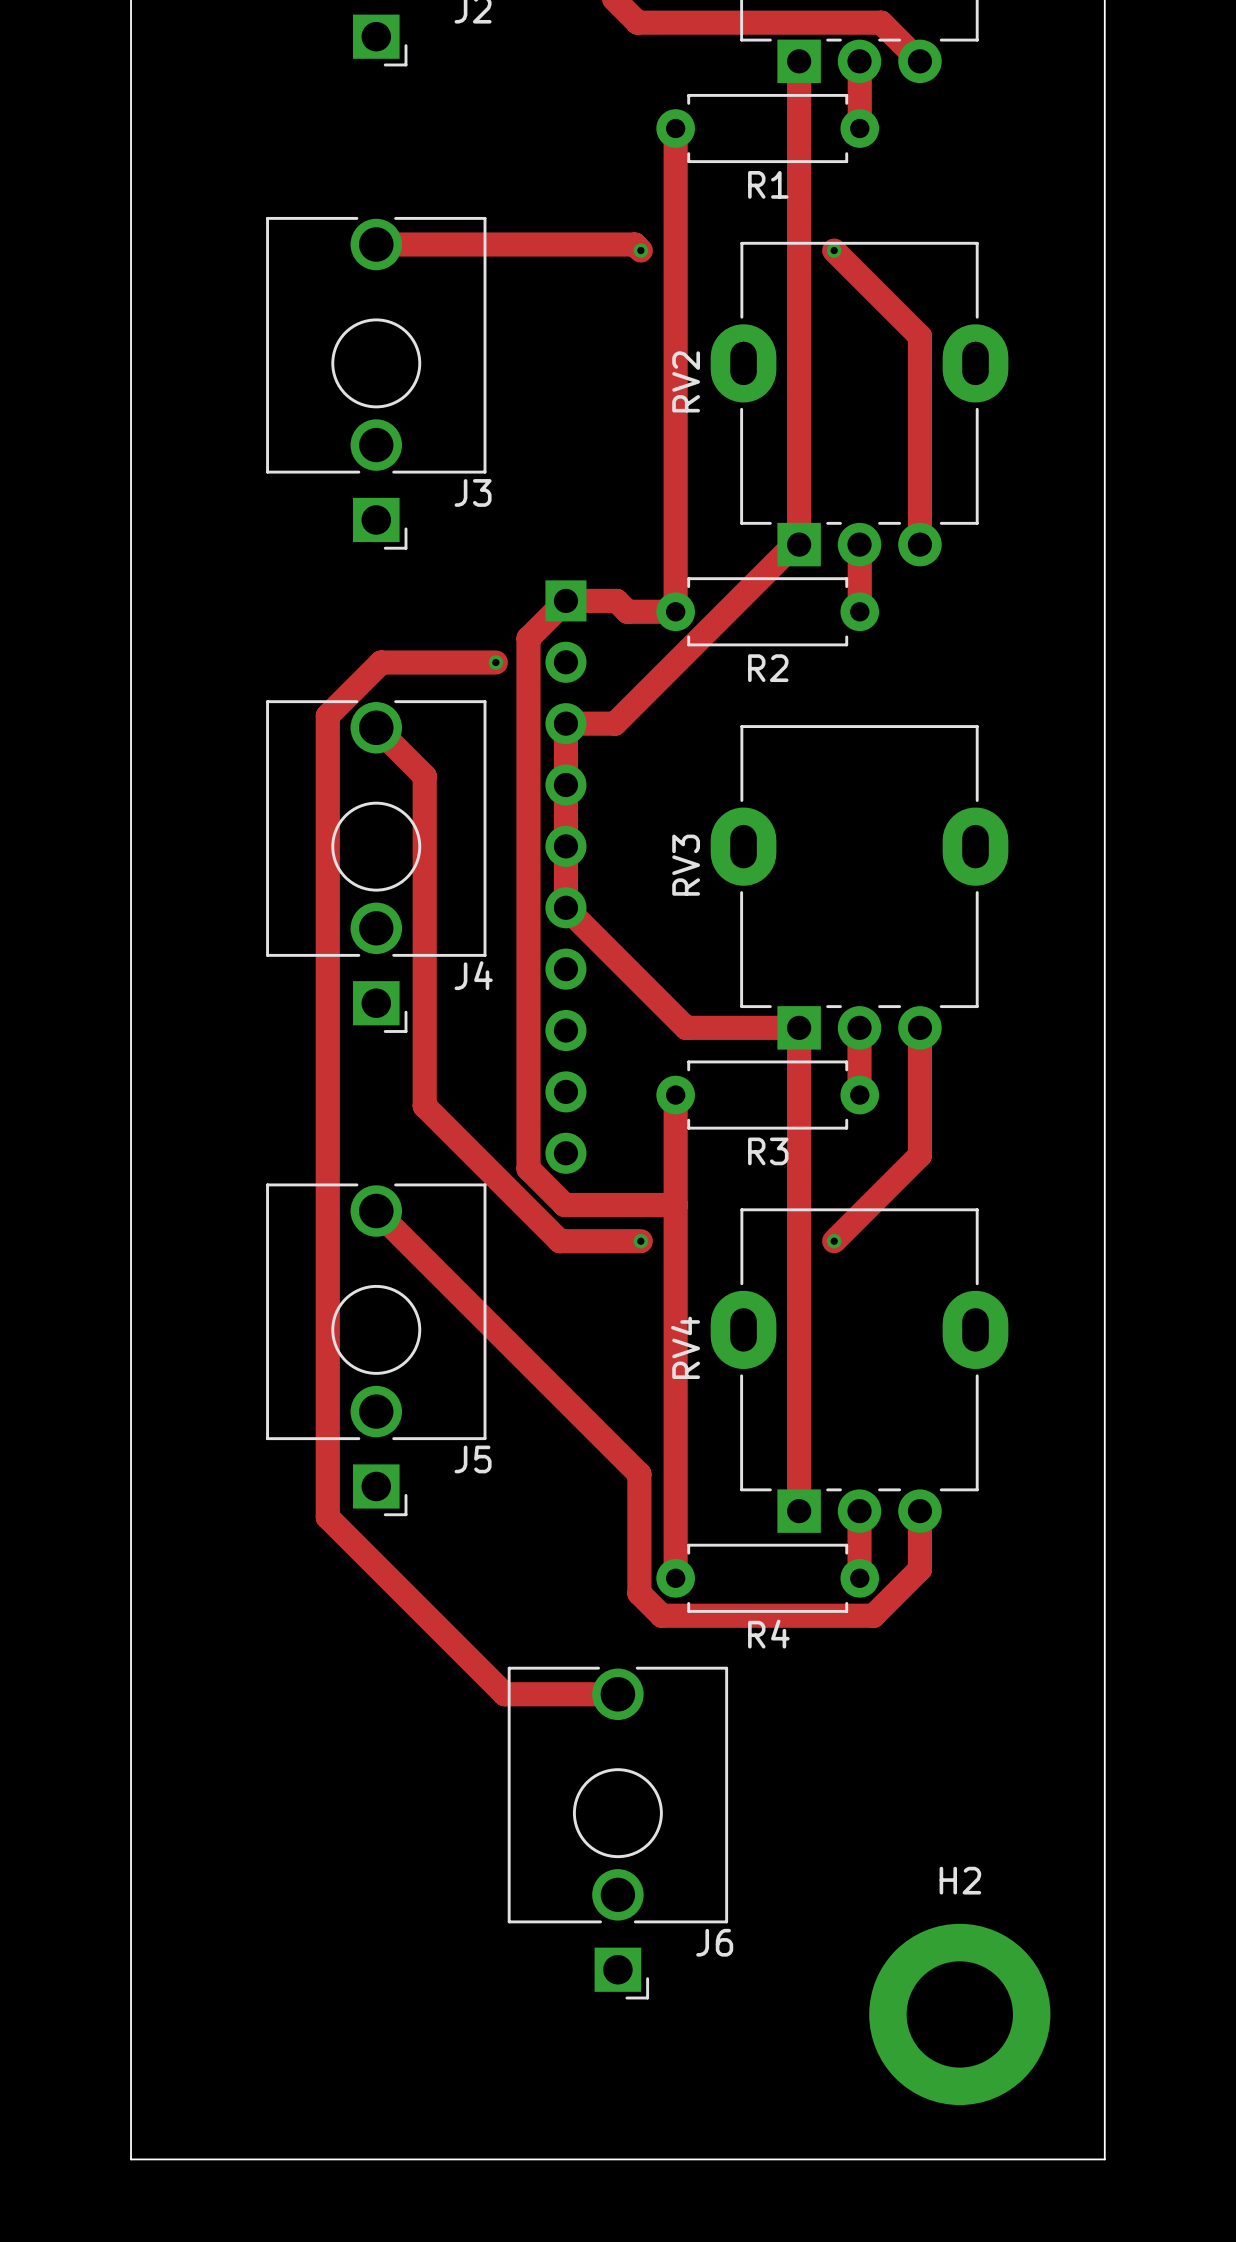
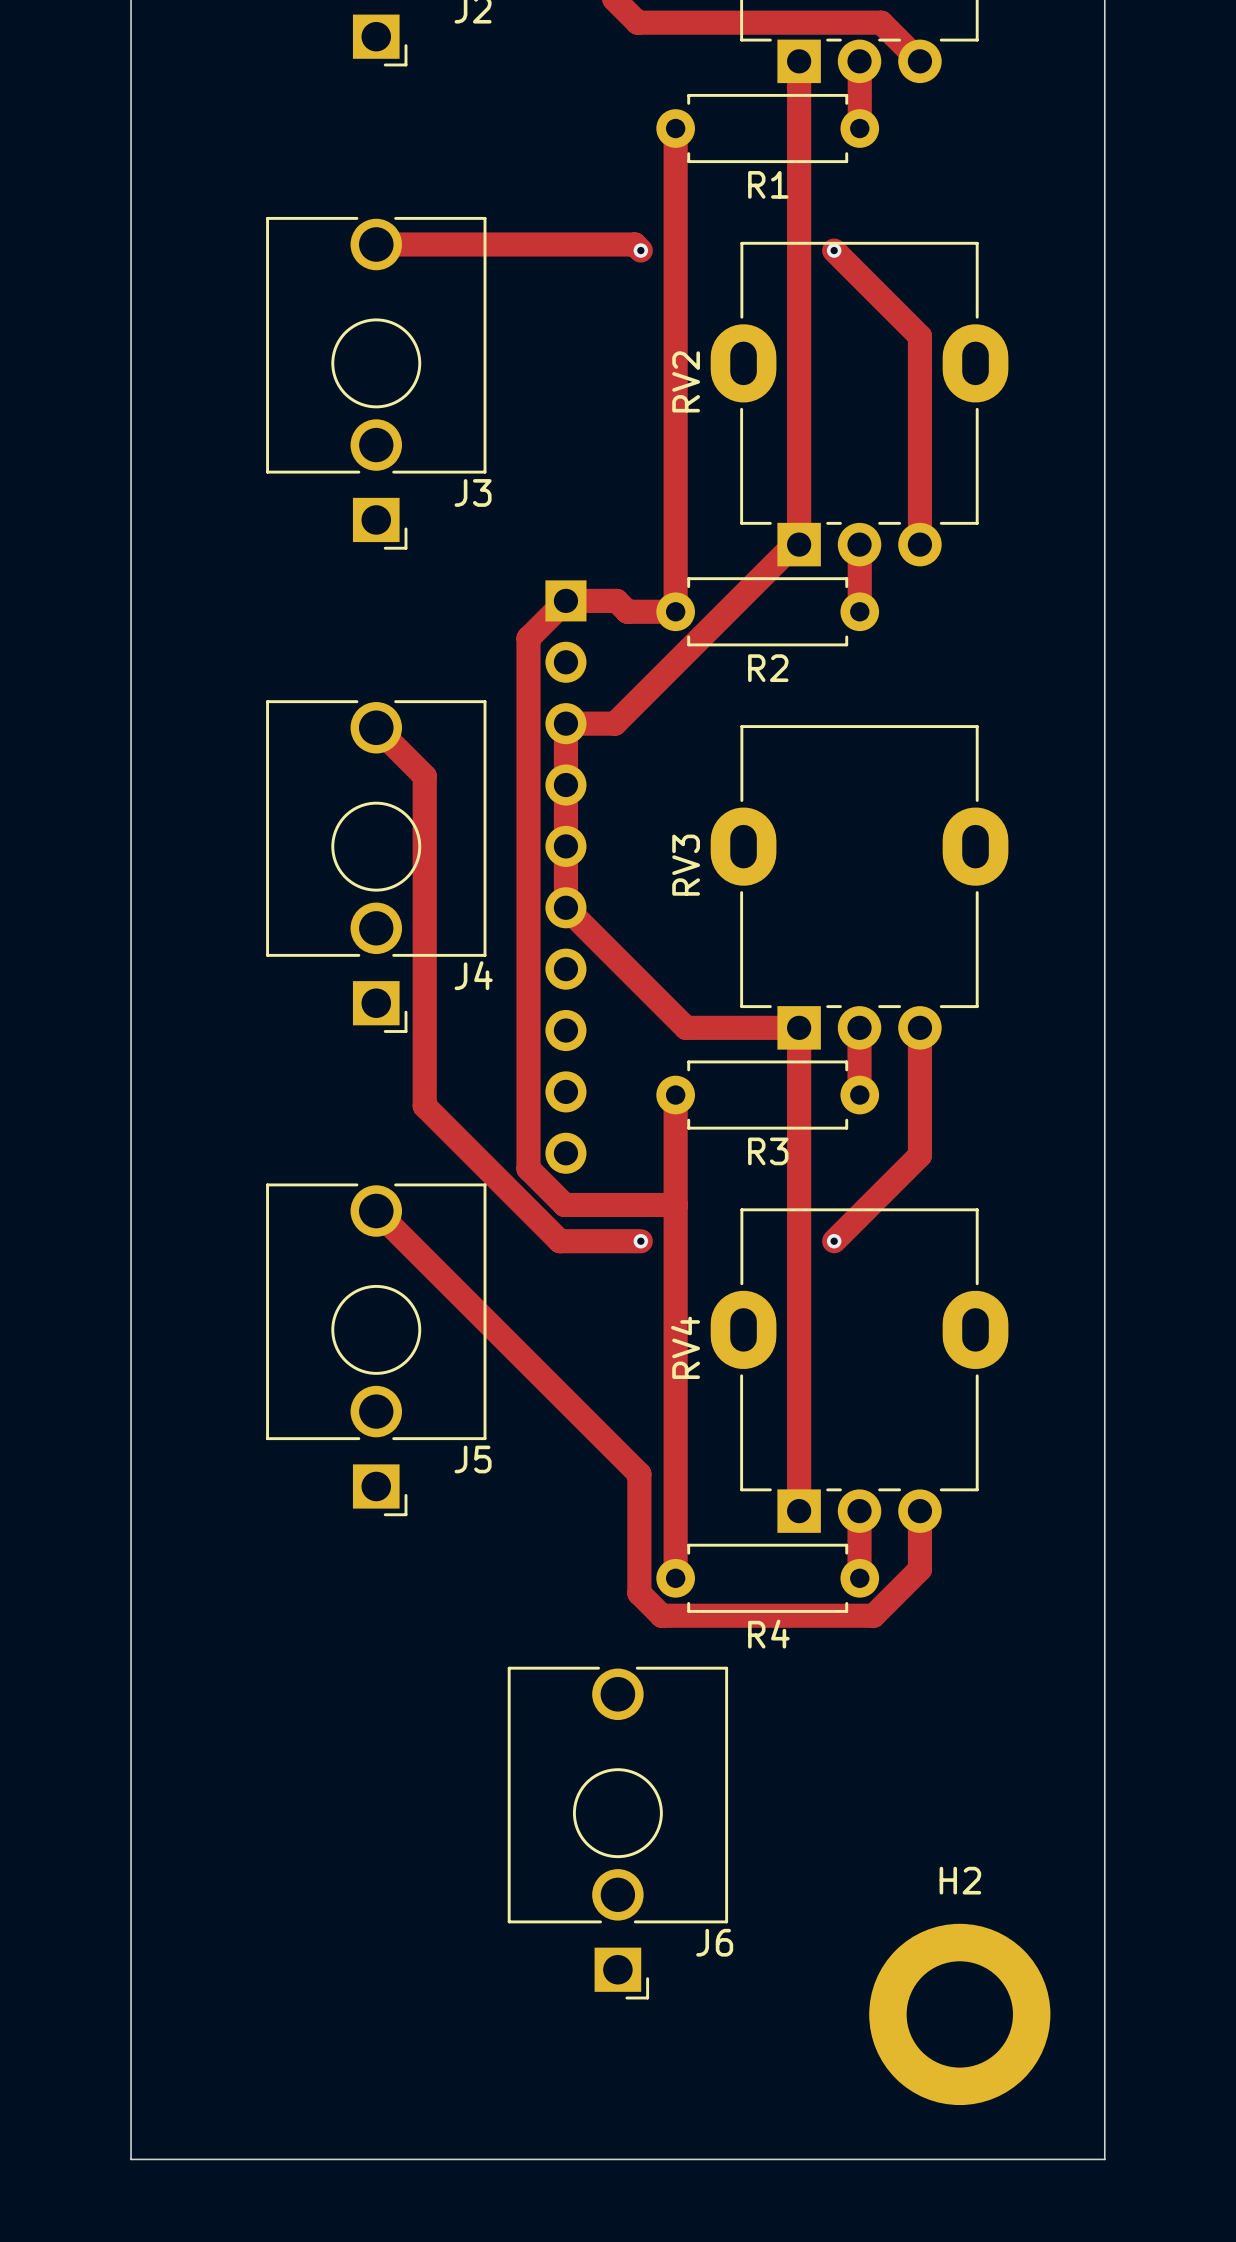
track: (495, 662) (381, 662) (327, 715) (327, 1517) (504, 1694) (617, 1694) -> none
via: (495, 662) -> none

